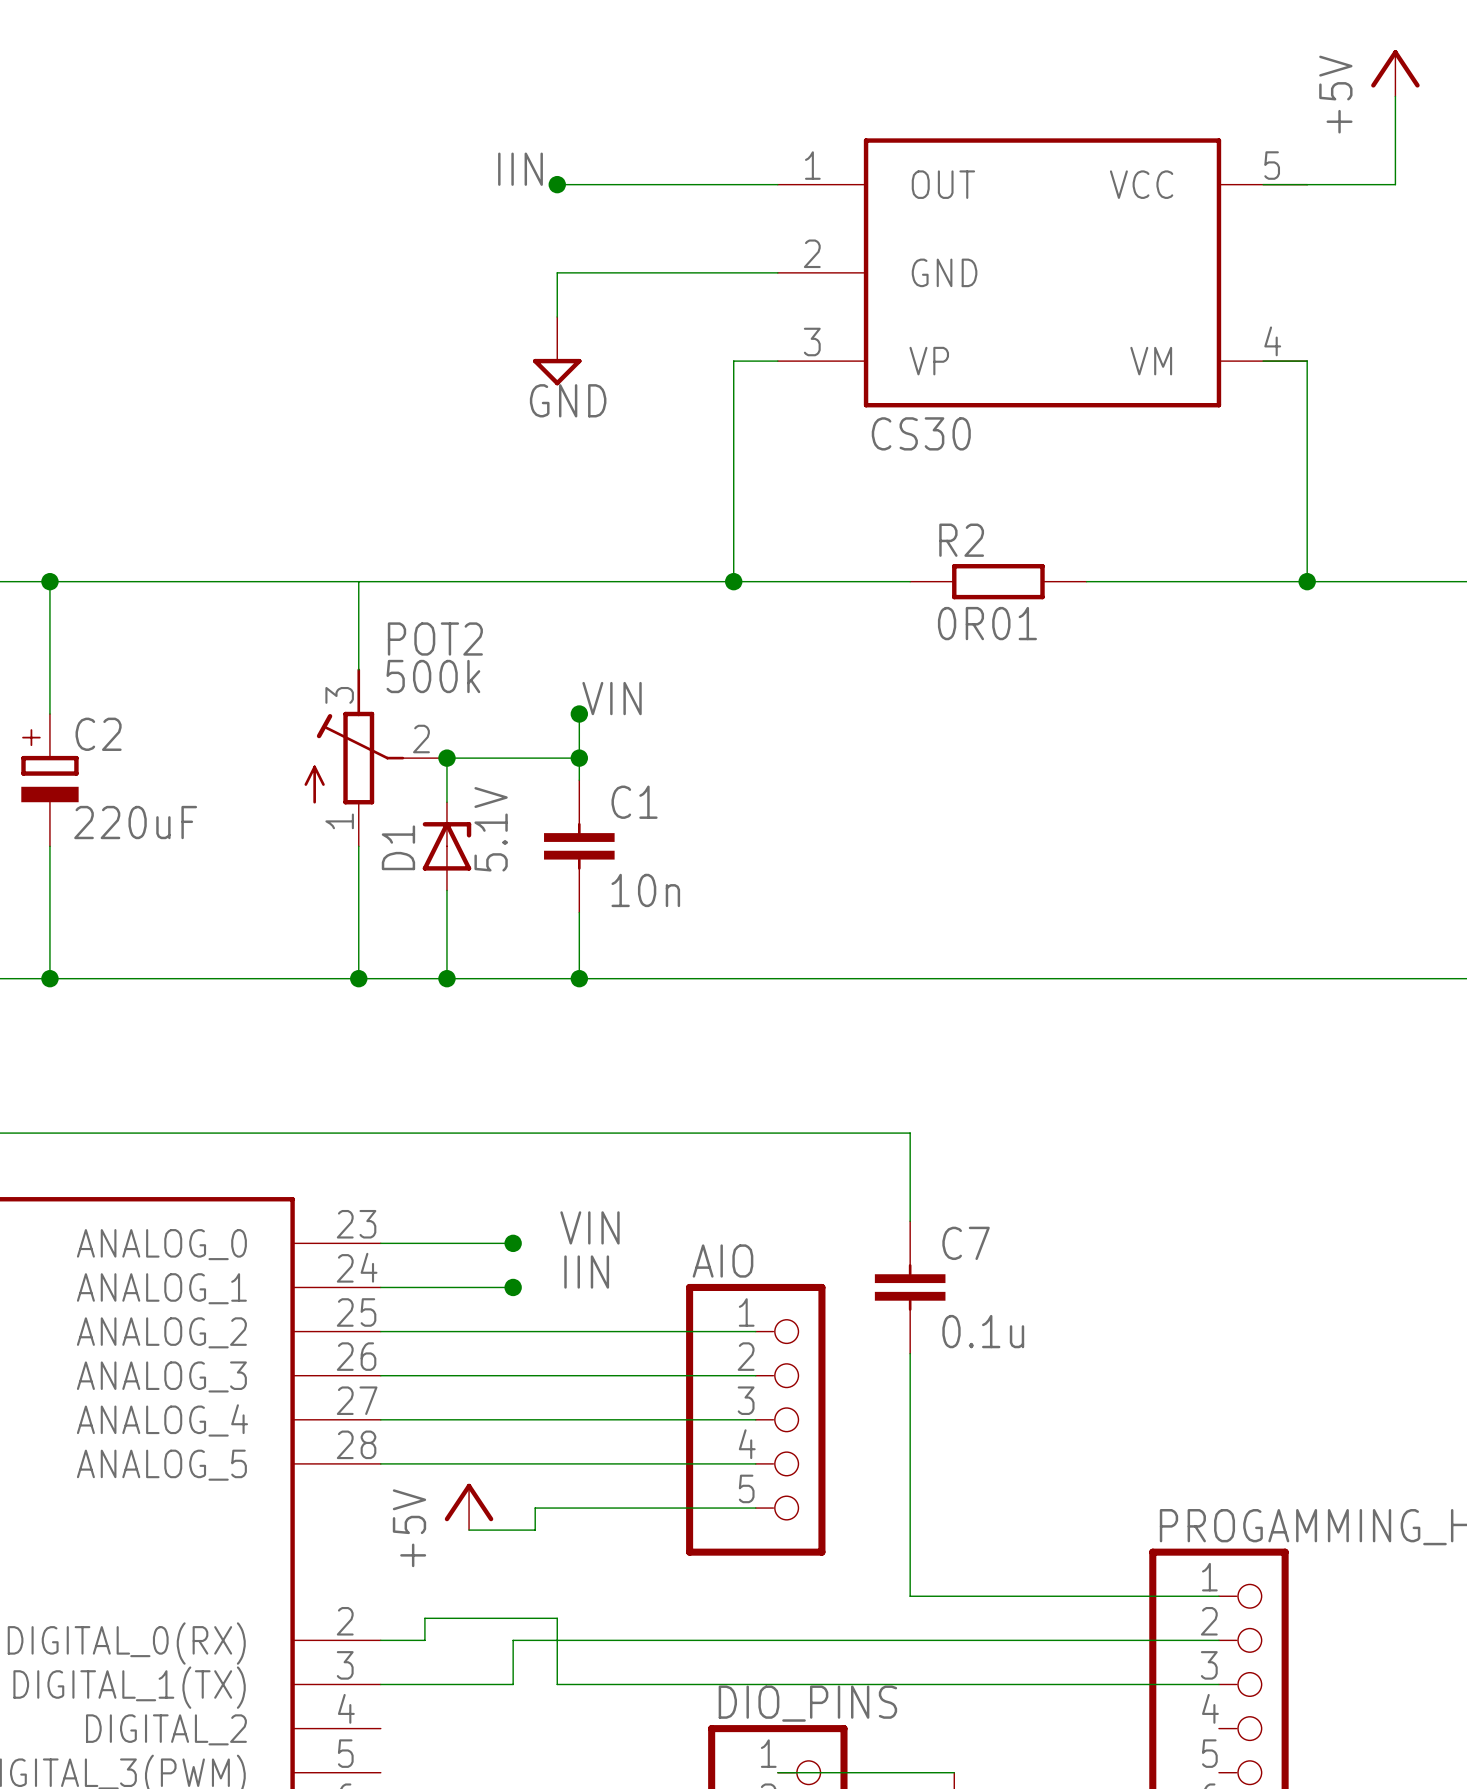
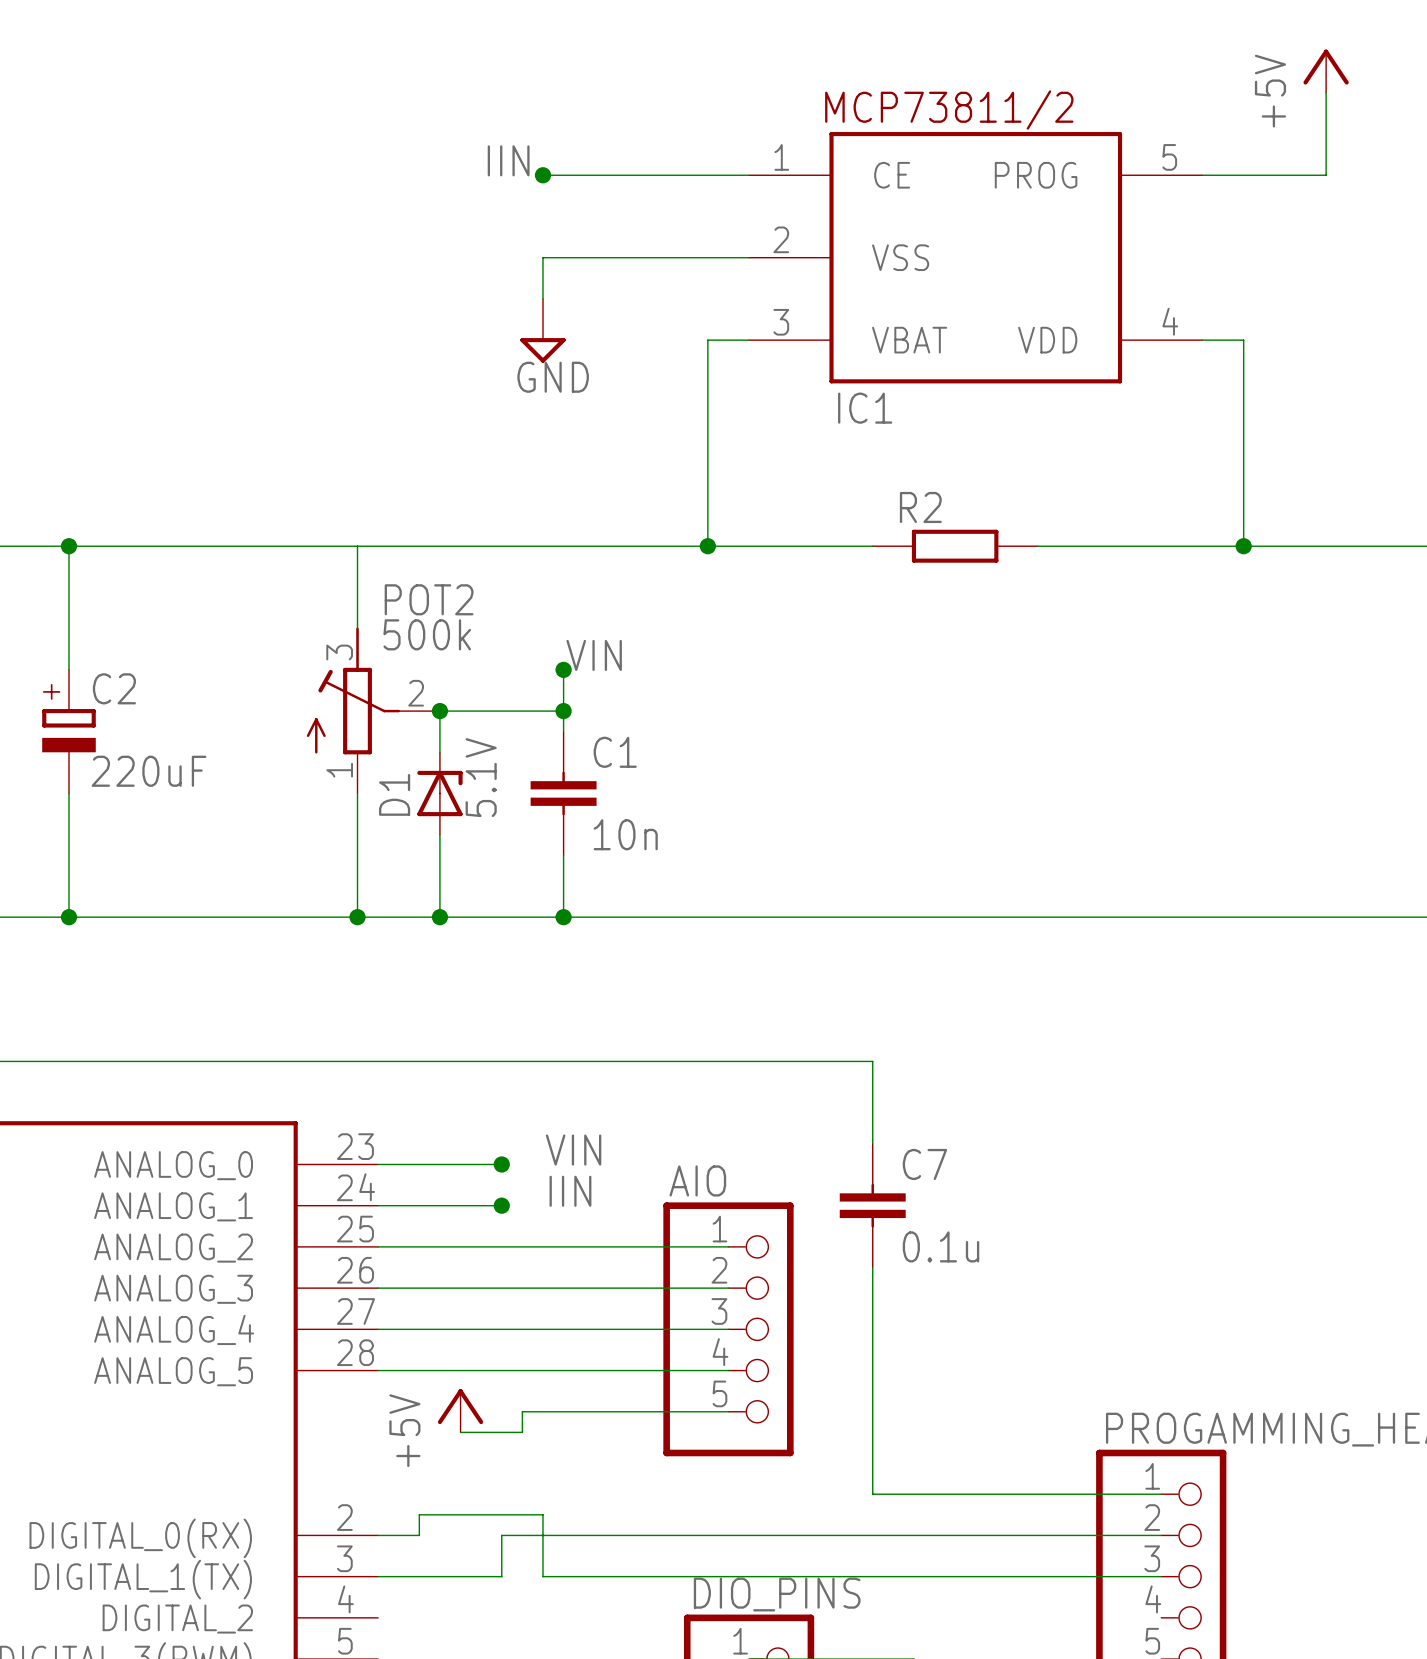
IC1: none -> (975, 257)
part: (1042, 272) -> none
R2 value: 0R01 (987, 623) -> none

